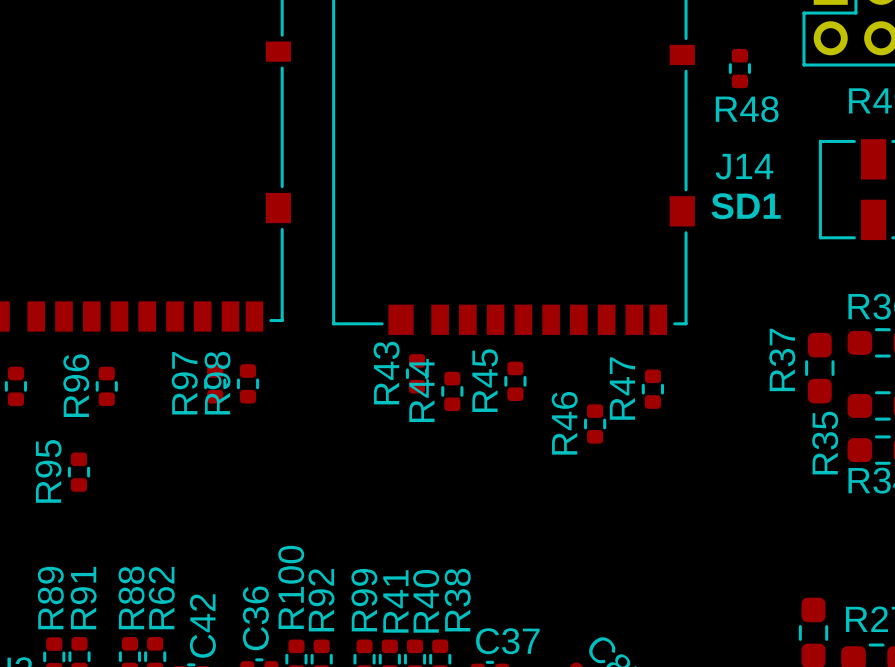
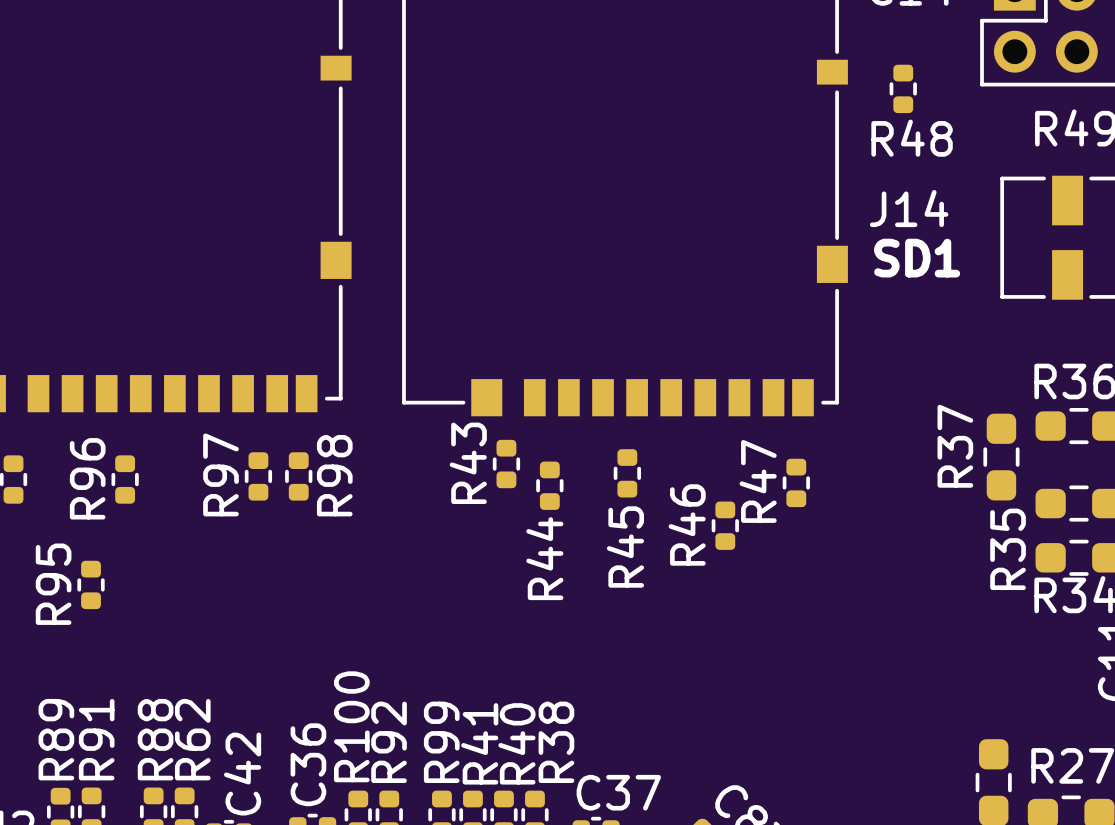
R45 name position: R45 (485, 380) -> R45 (625, 546)
R98 name position: R98 (217, 383) -> R98 (334, 475)
R44 name position: R44 (421, 390) -> R44 (544, 558)

